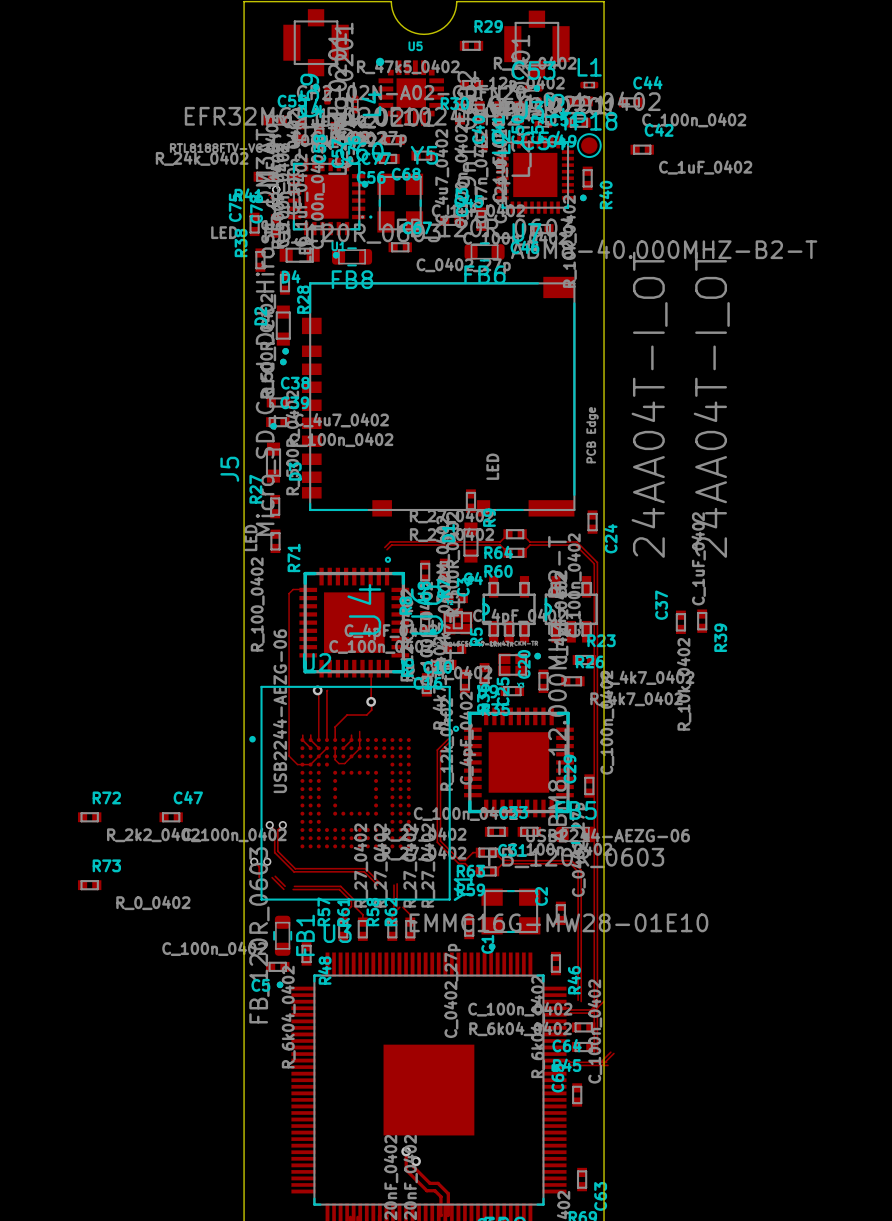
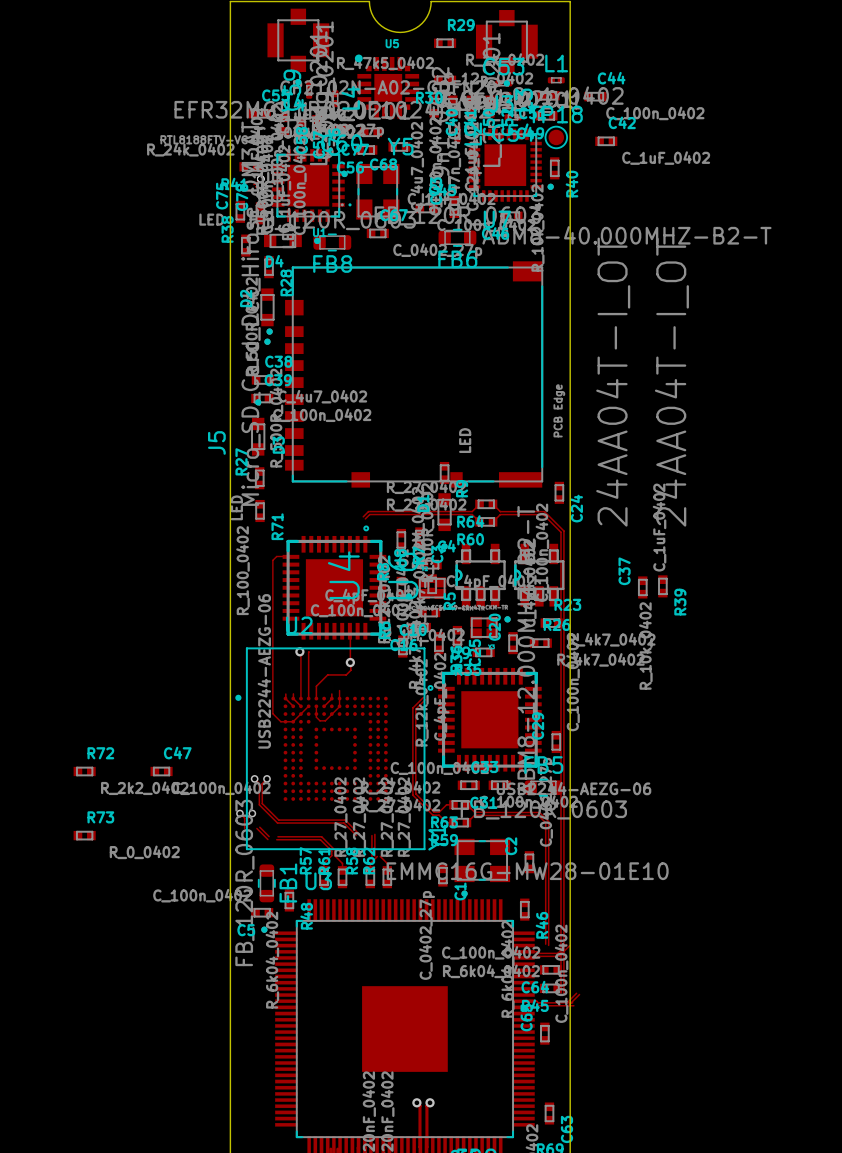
track: (406, 1151) (406, 1169) (426, 1190) (434, 1190) (440, 1196) (441, 1215) -> none
via: (406, 1151) -> none
track: (416, 1161) (413, 1166) (429, 1183) (437, 1183) (448, 1193) (447, 1215) -> none
via: (416, 1161) -> none
track: none -> (416, 1102) (419, 1105) (420, 1147)
via: none -> (416, 1102)
track: none -> (430, 1102) (426, 1105) (426, 1147)
via: none -> (430, 1102)

